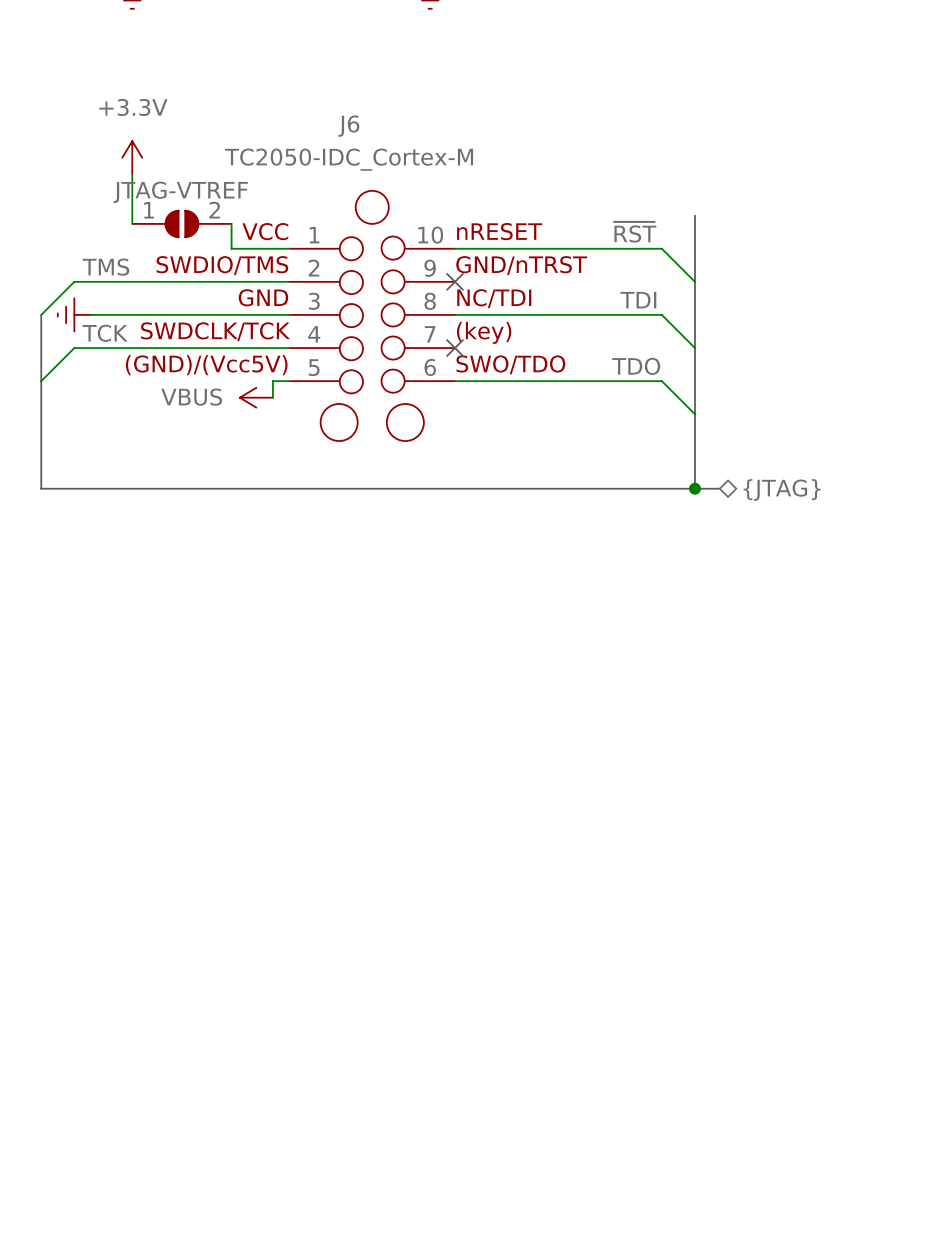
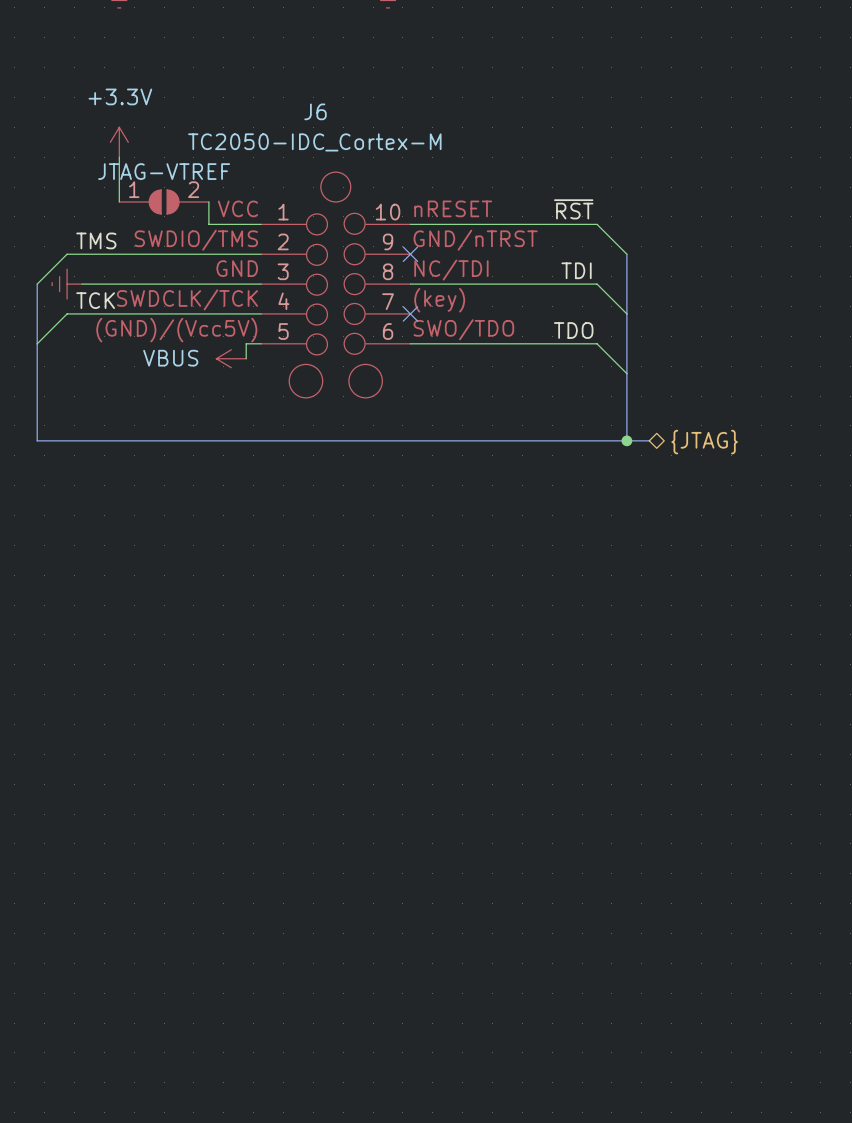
bus: (694, 215) (694, 281) -> none

